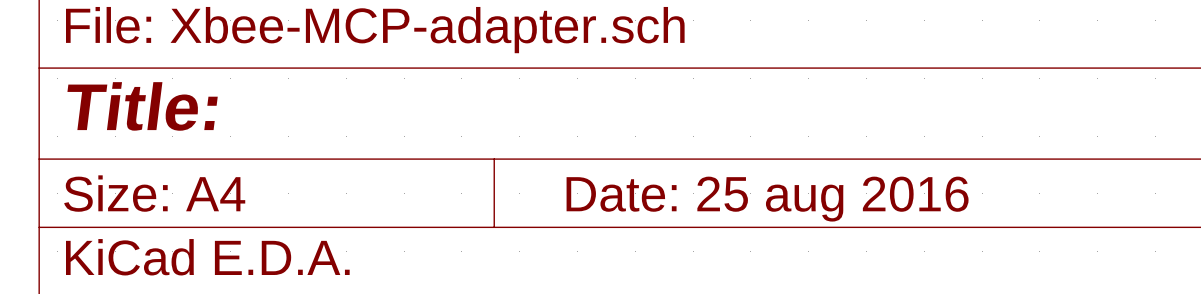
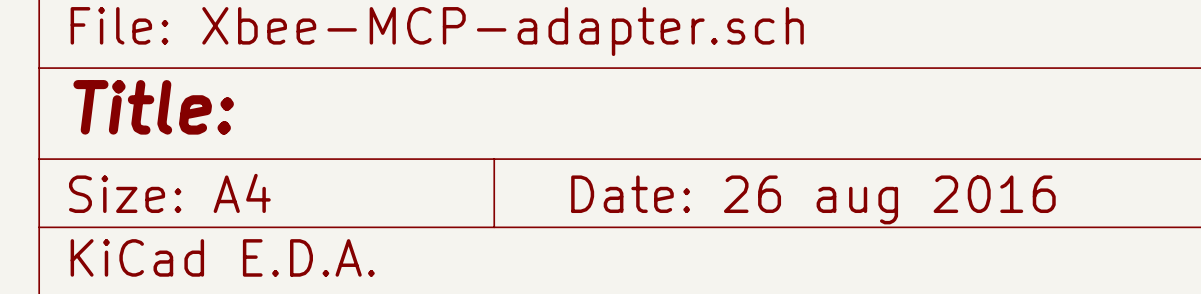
title block: Date: 25 aug 2016 (767, 199) -> Date: 26 aug 2016 (813, 199)

